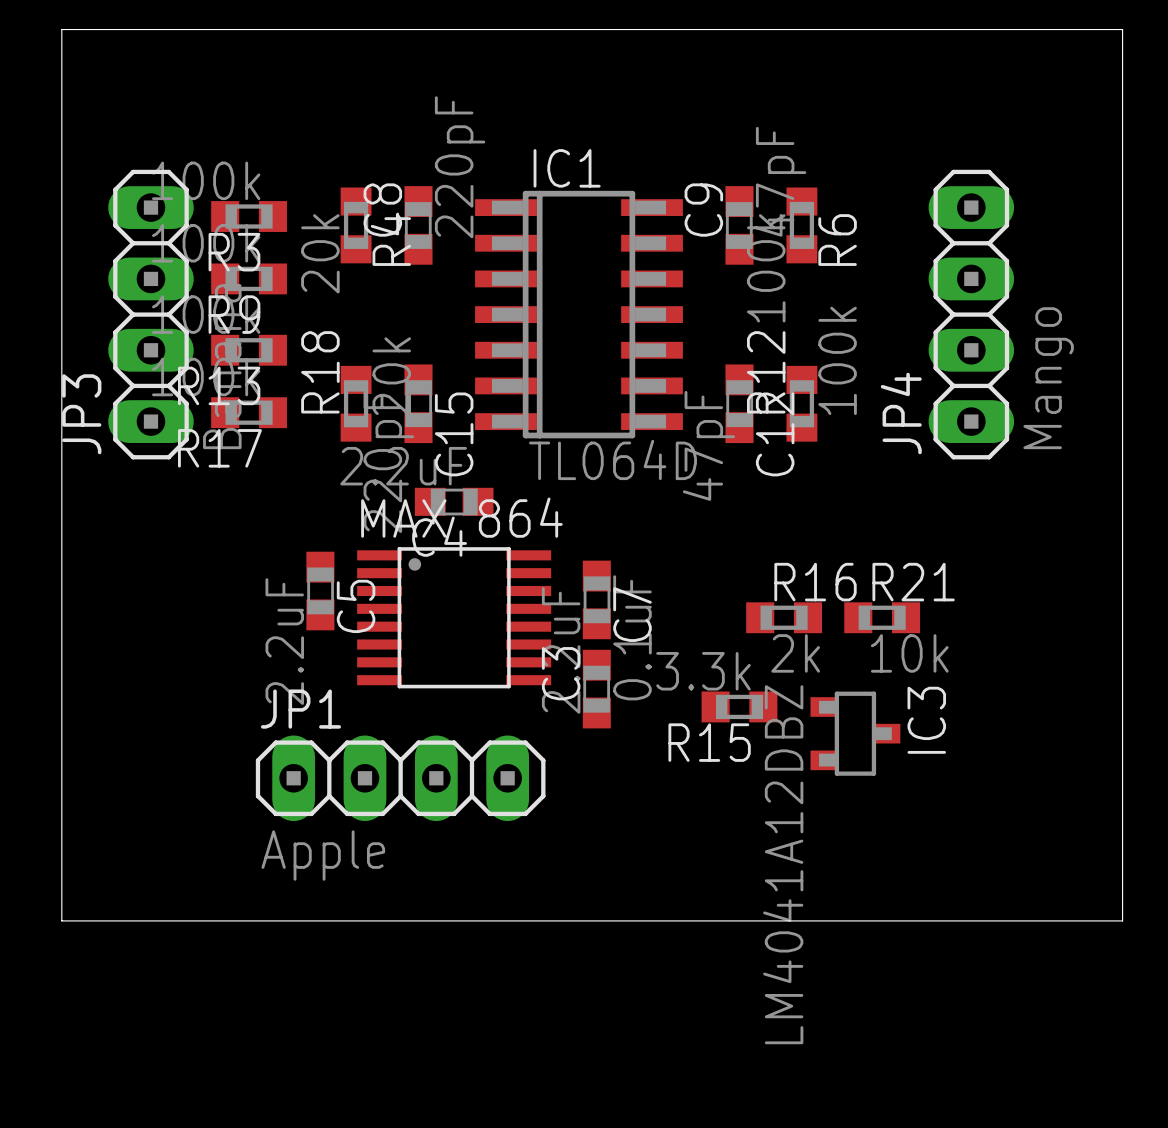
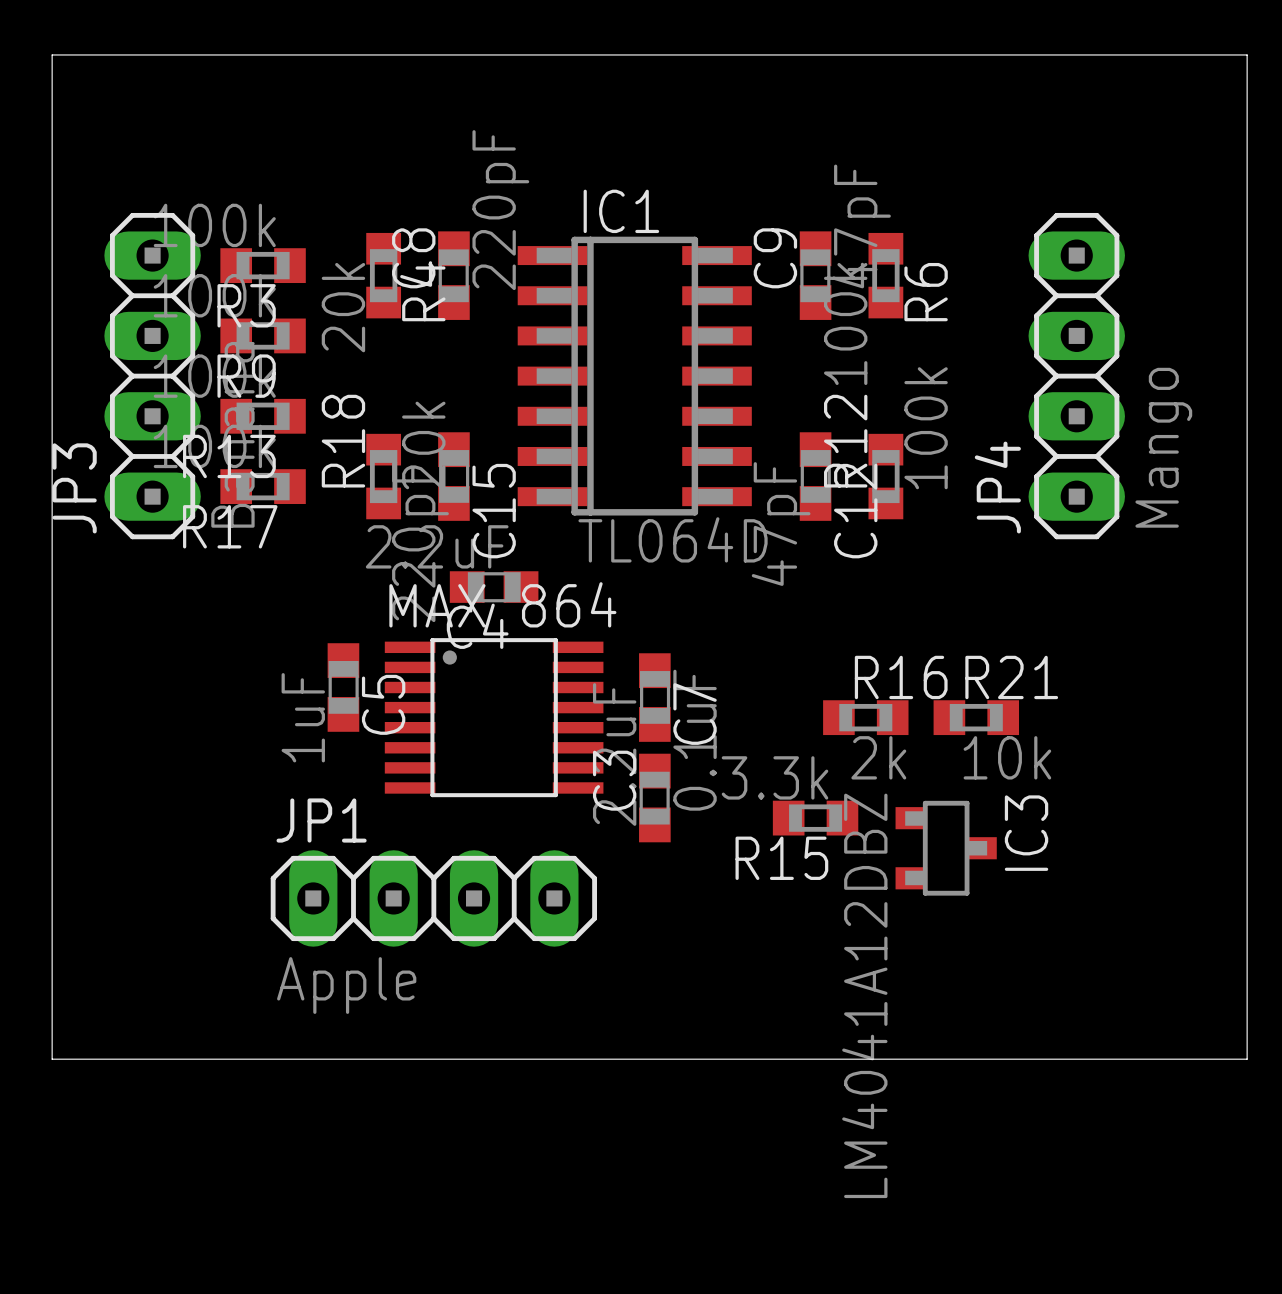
C5 value: 2.2uF (284, 641) -> 1uF (303, 717)

